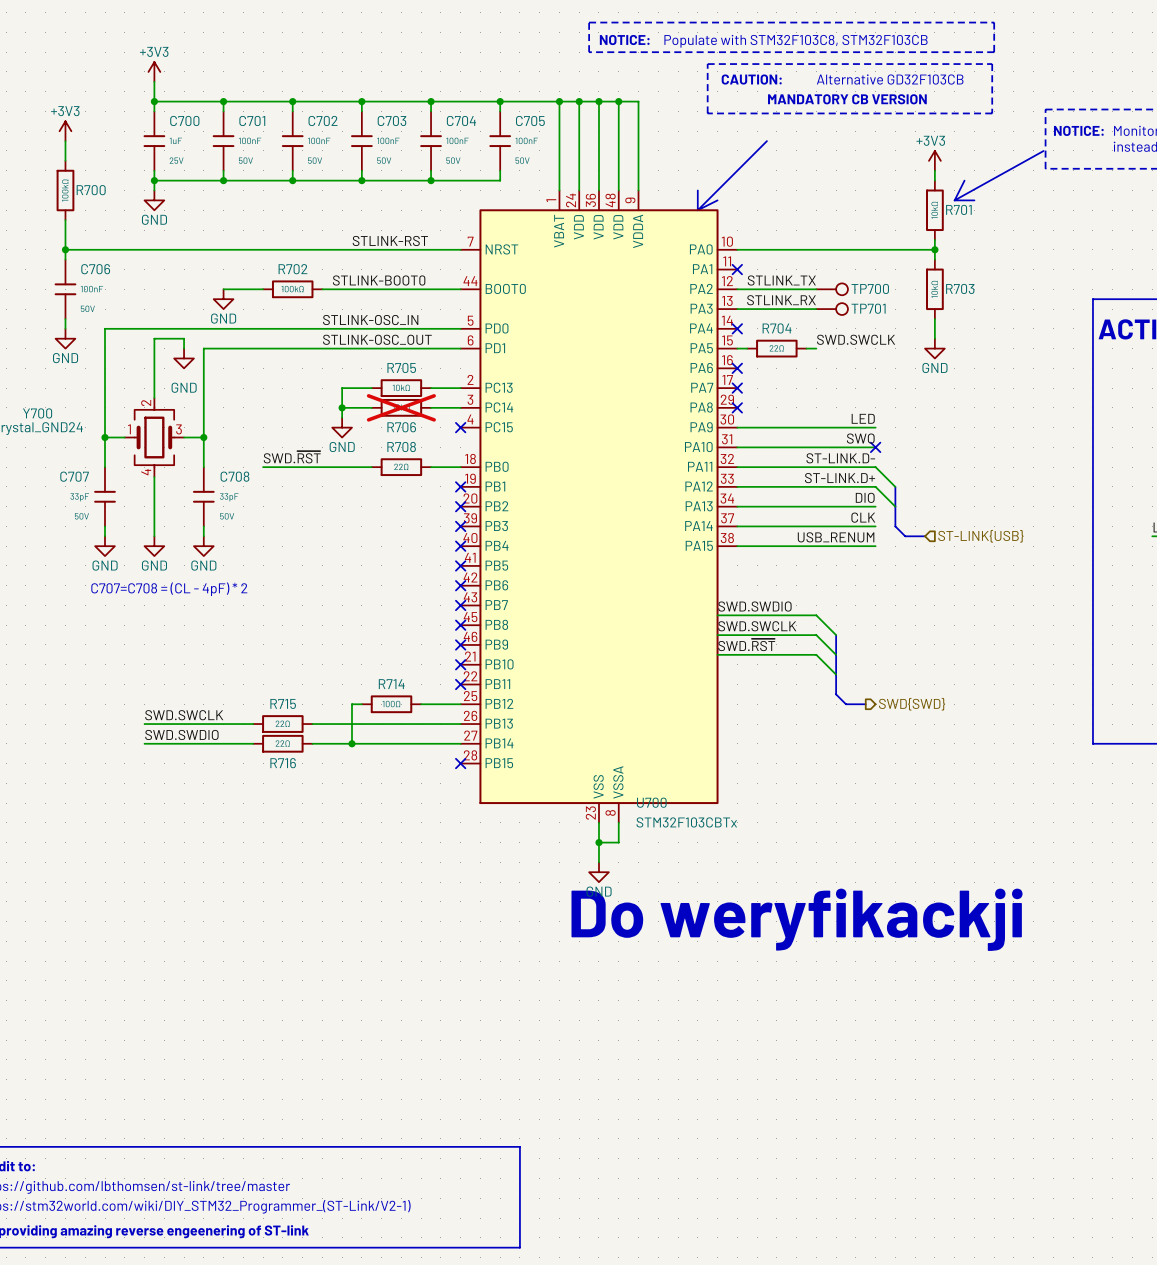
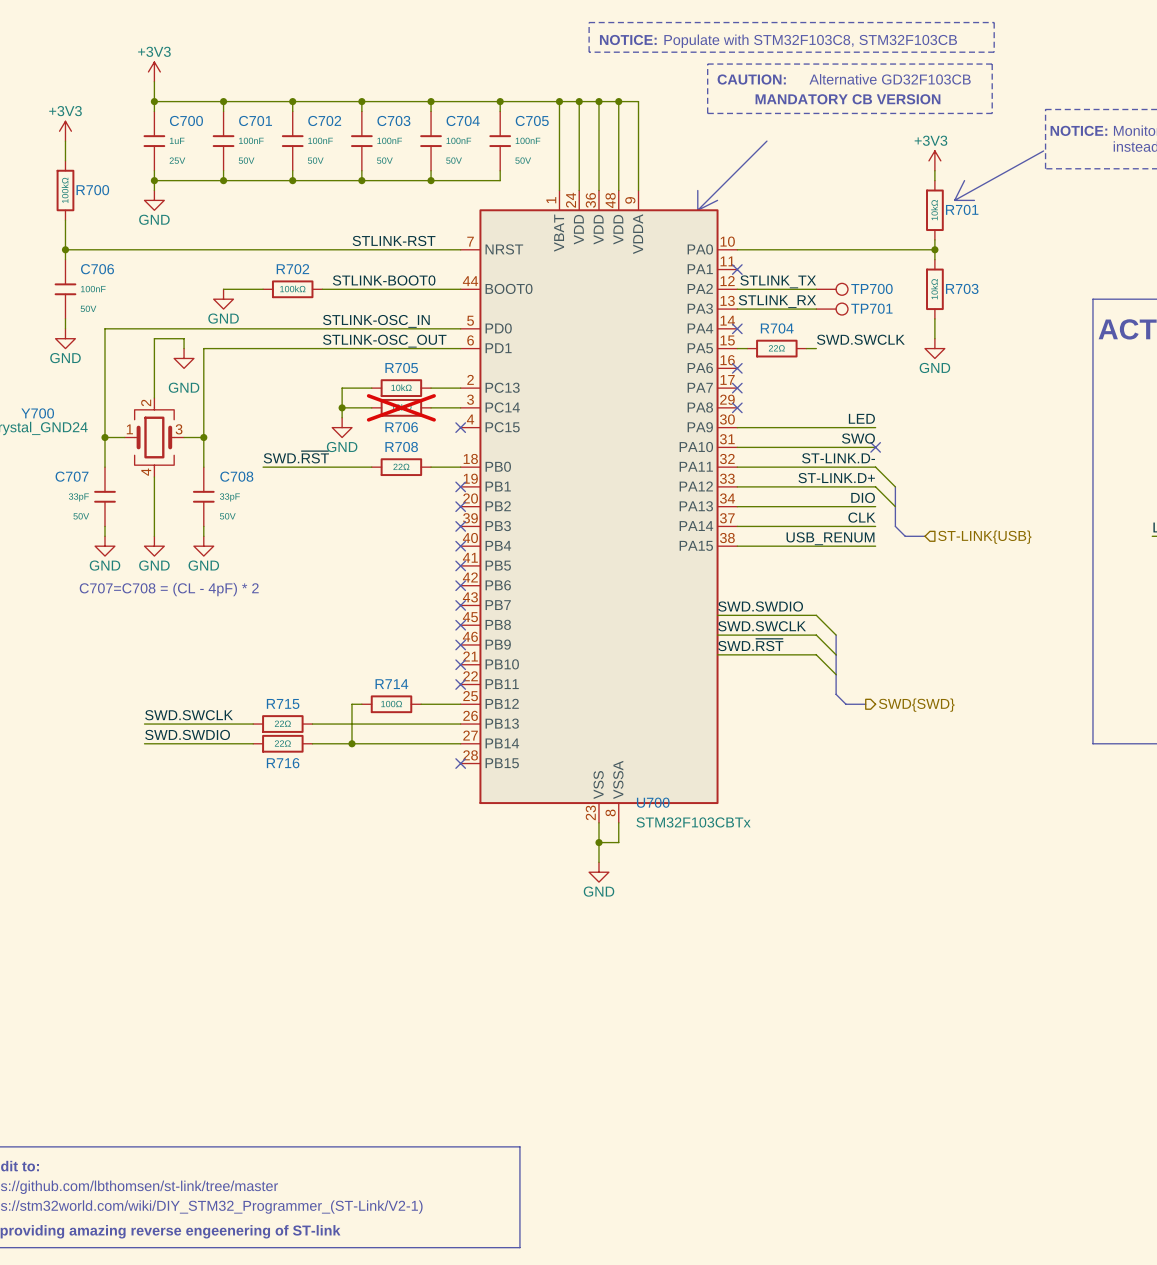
text: Do weryfikackji (797, 919) -> none

